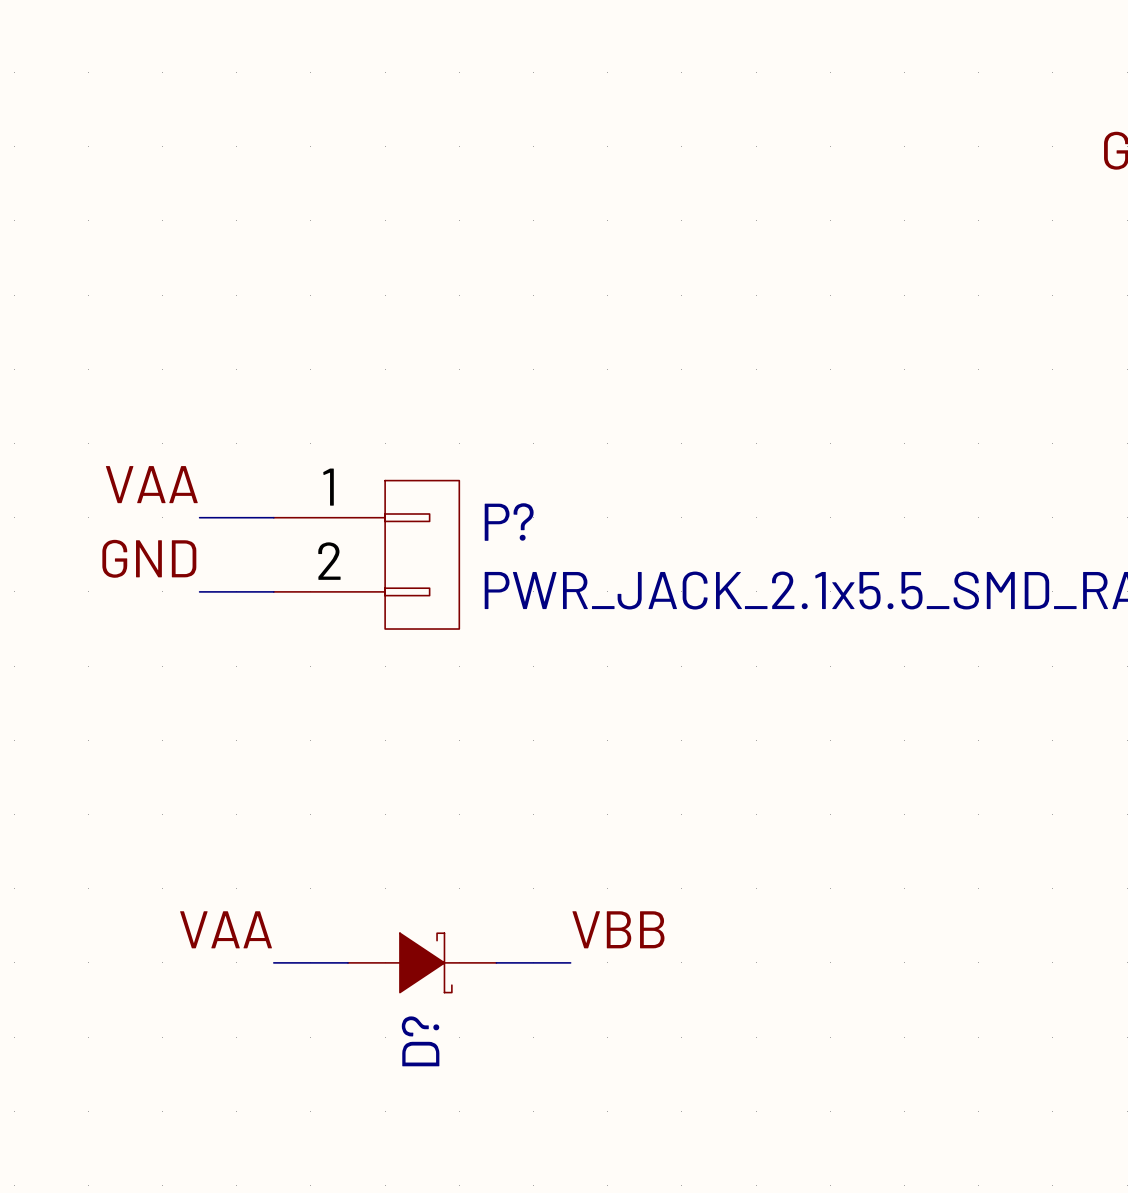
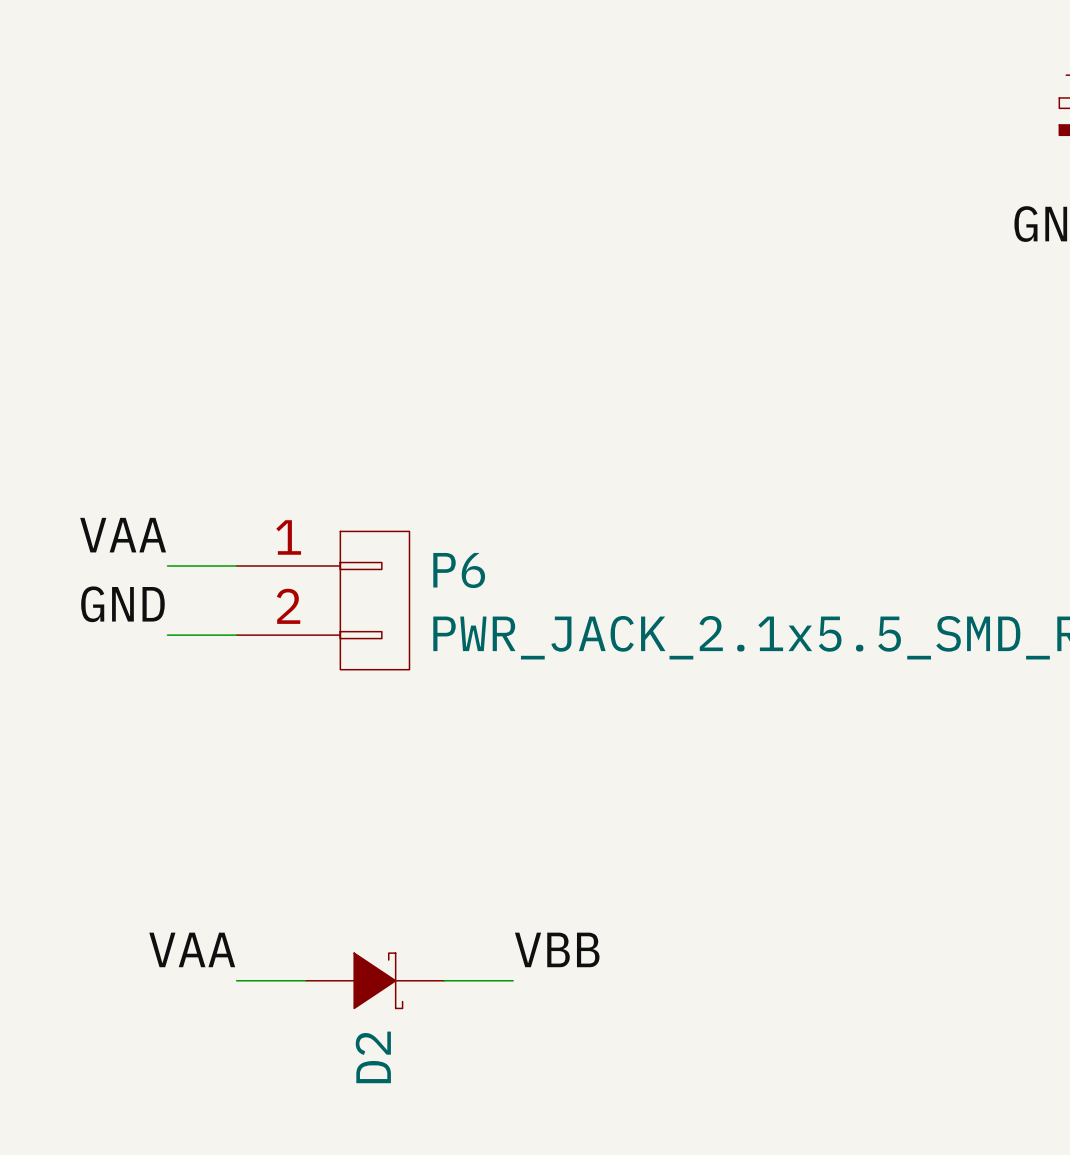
P? name: P? (509, 522) -> P6 (459, 570)
D? name: D? (420, 1041) -> D2 (373, 1057)

